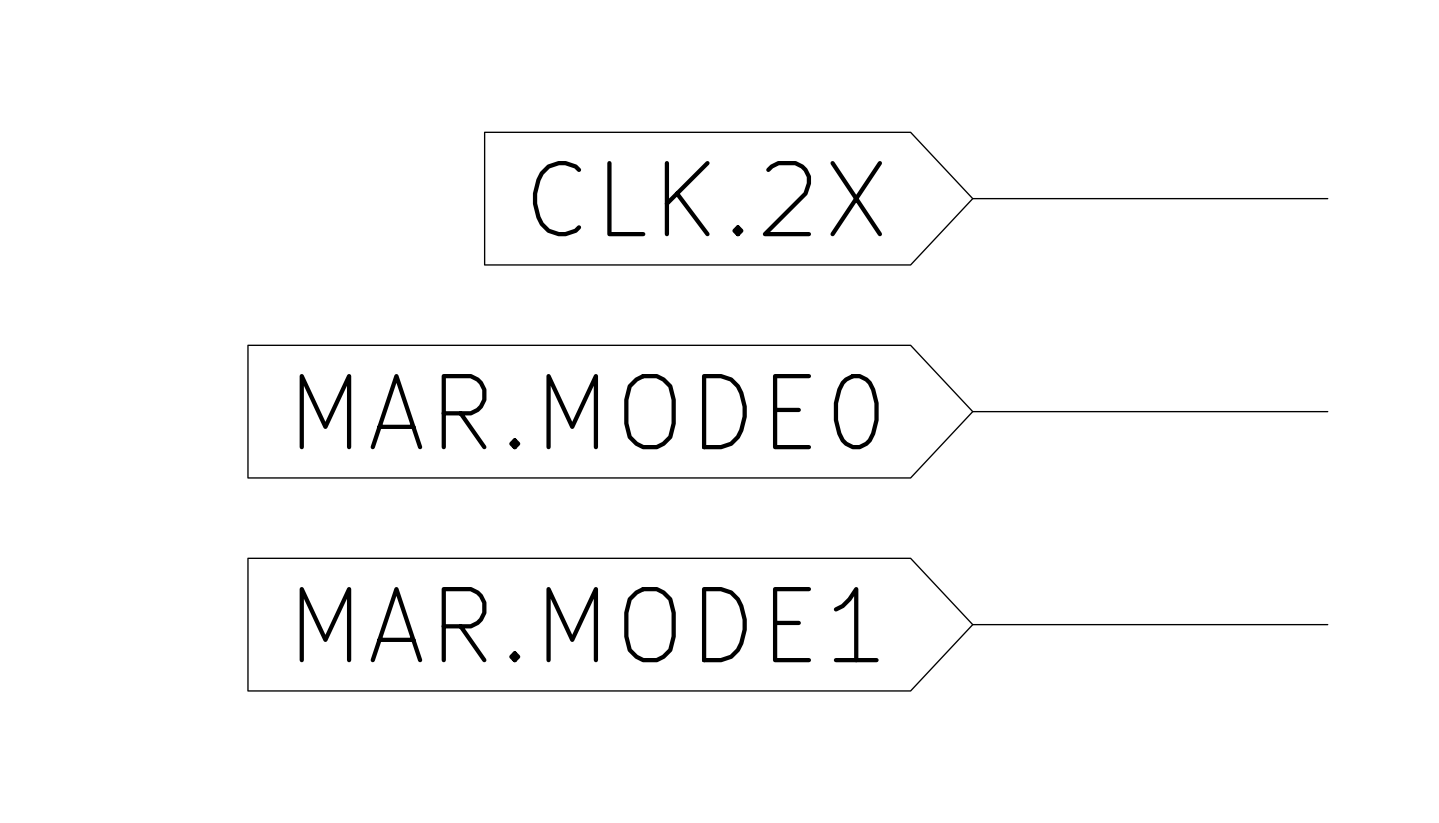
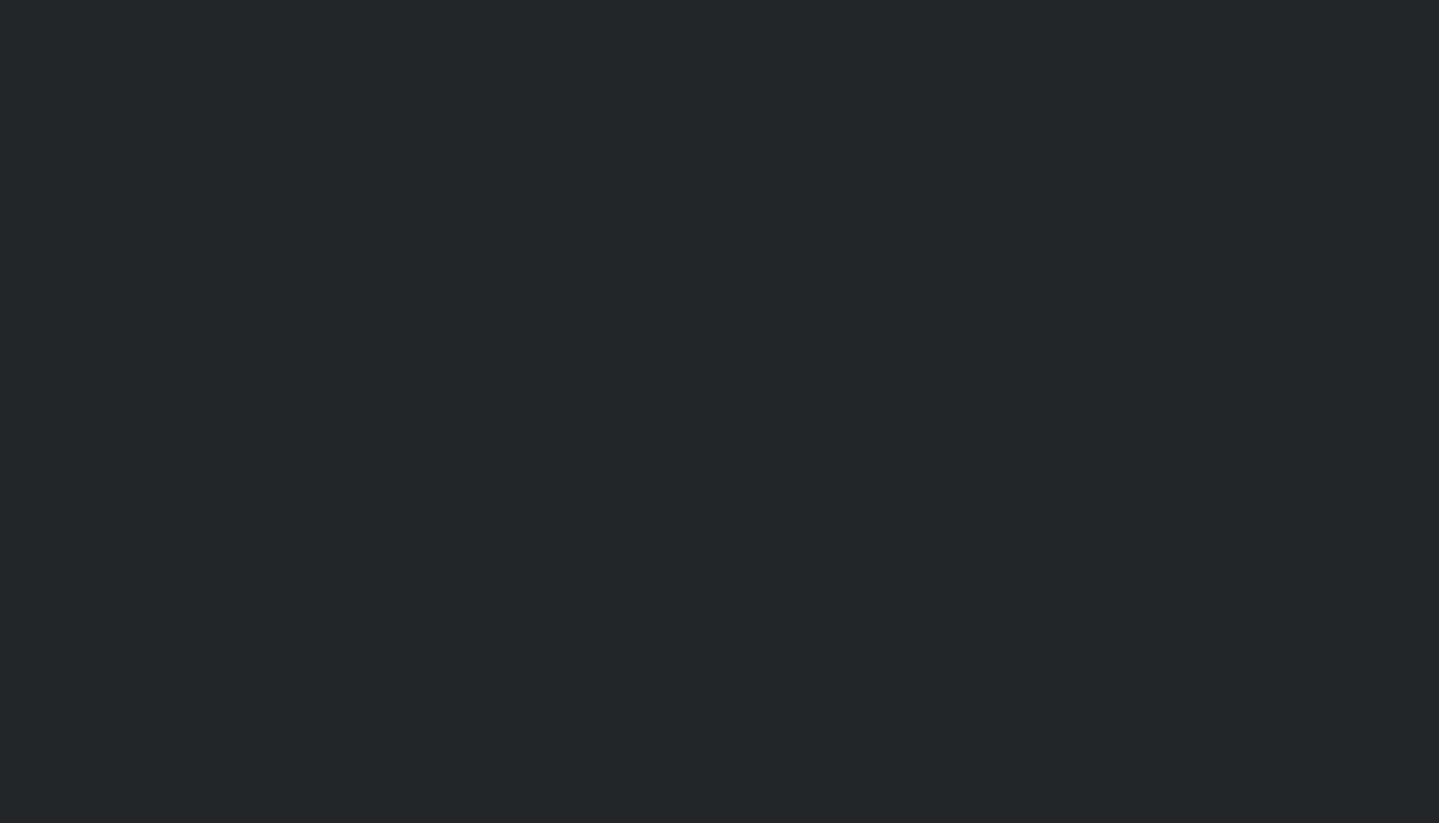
global label: CLK.2X (707, 198) -> none
wire: (972, 198) (1327, 198) -> none
global label: MAR.MODE0 (589, 411) -> none
wire: (972, 411) (1327, 411) -> none
global label: MAR.MODE1 (589, 624) -> none
wire: (972, 624) (1327, 624) -> none

